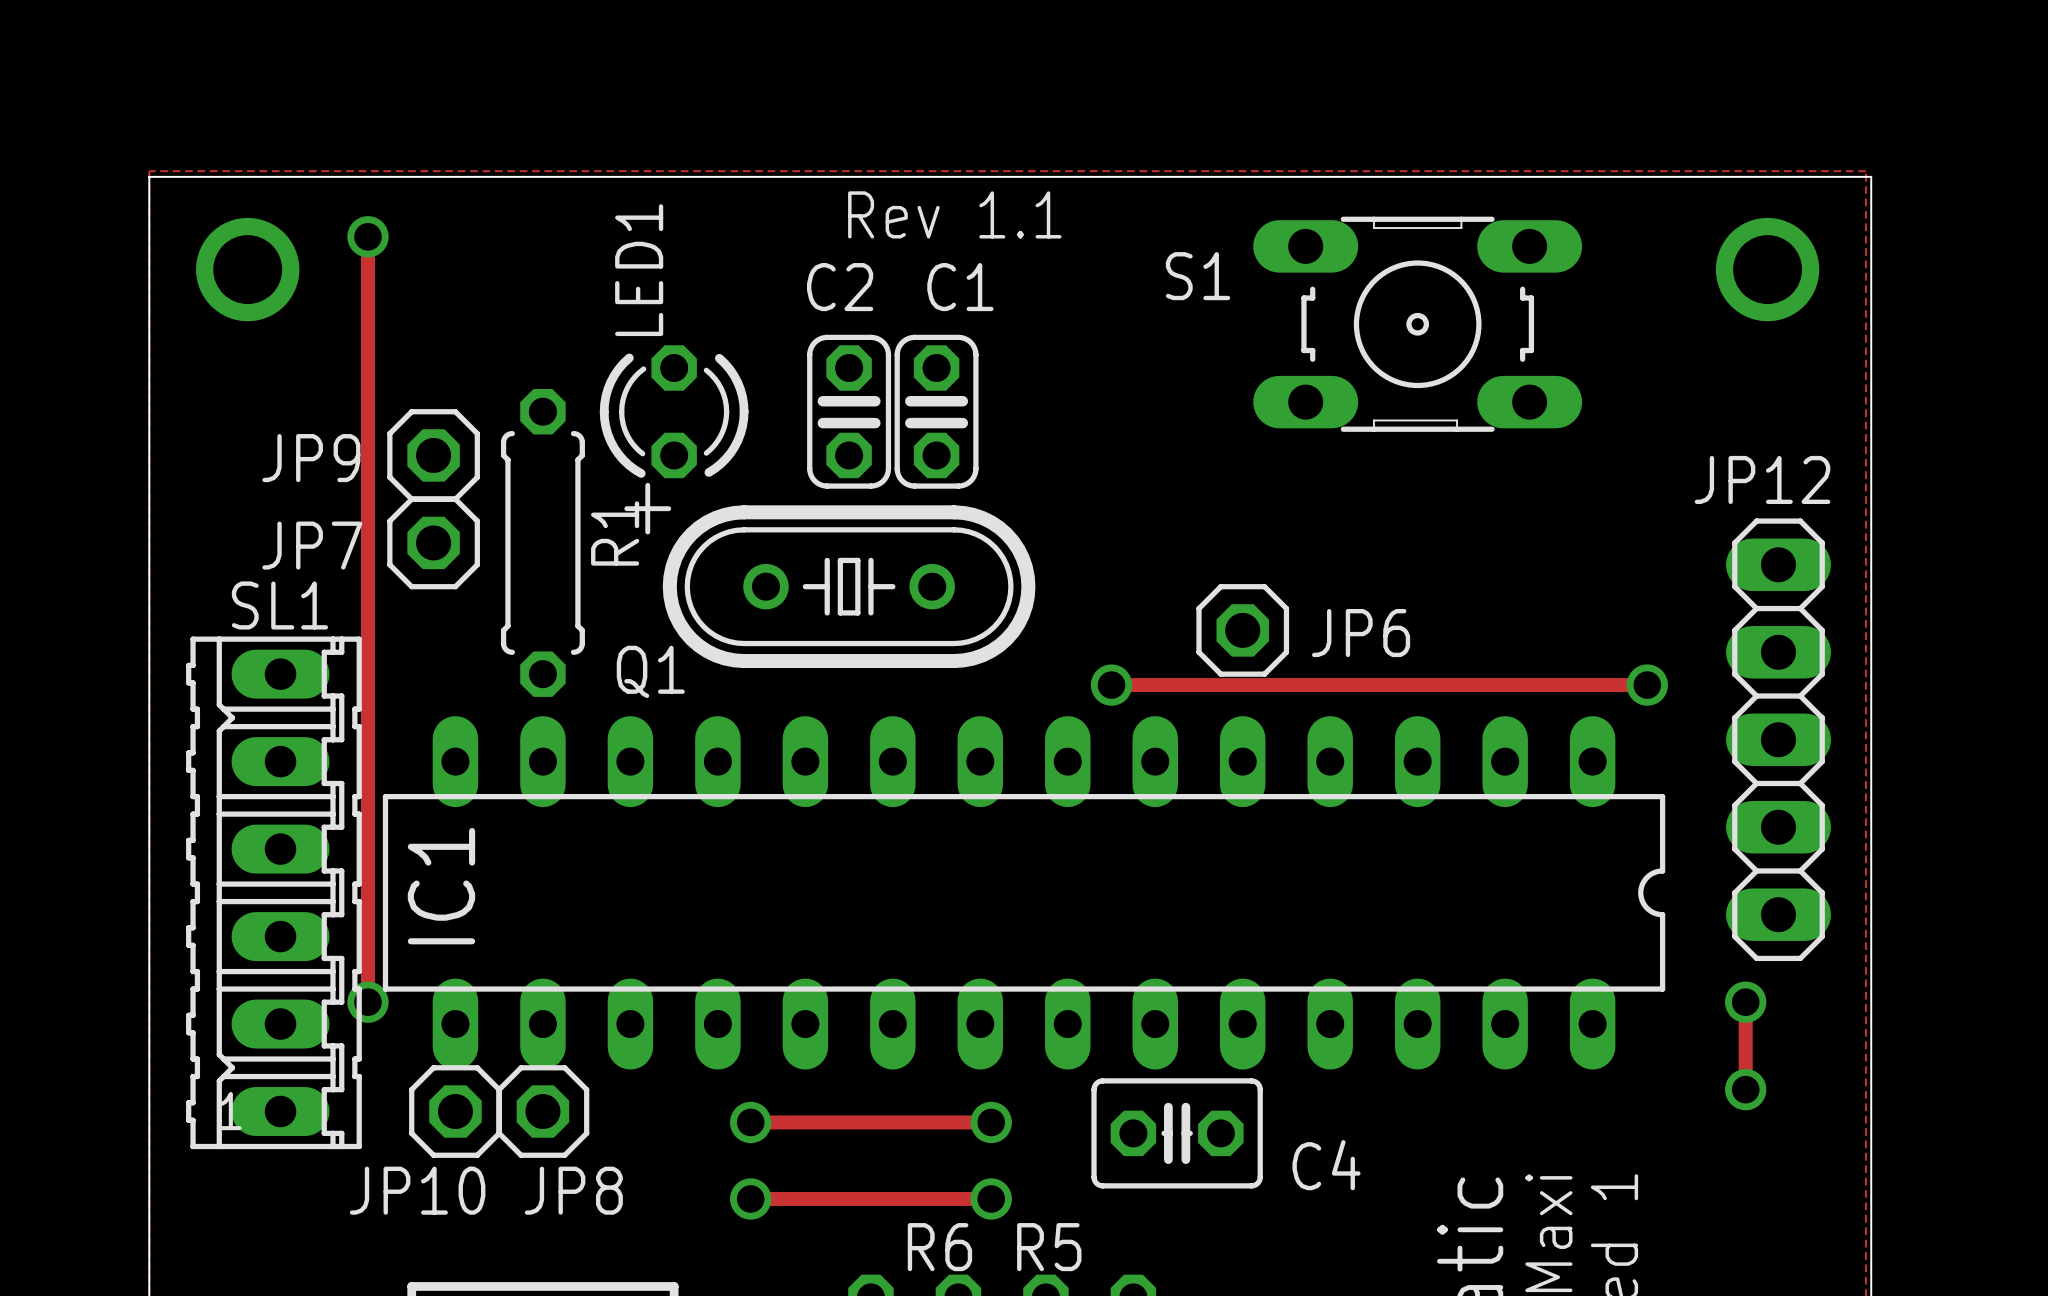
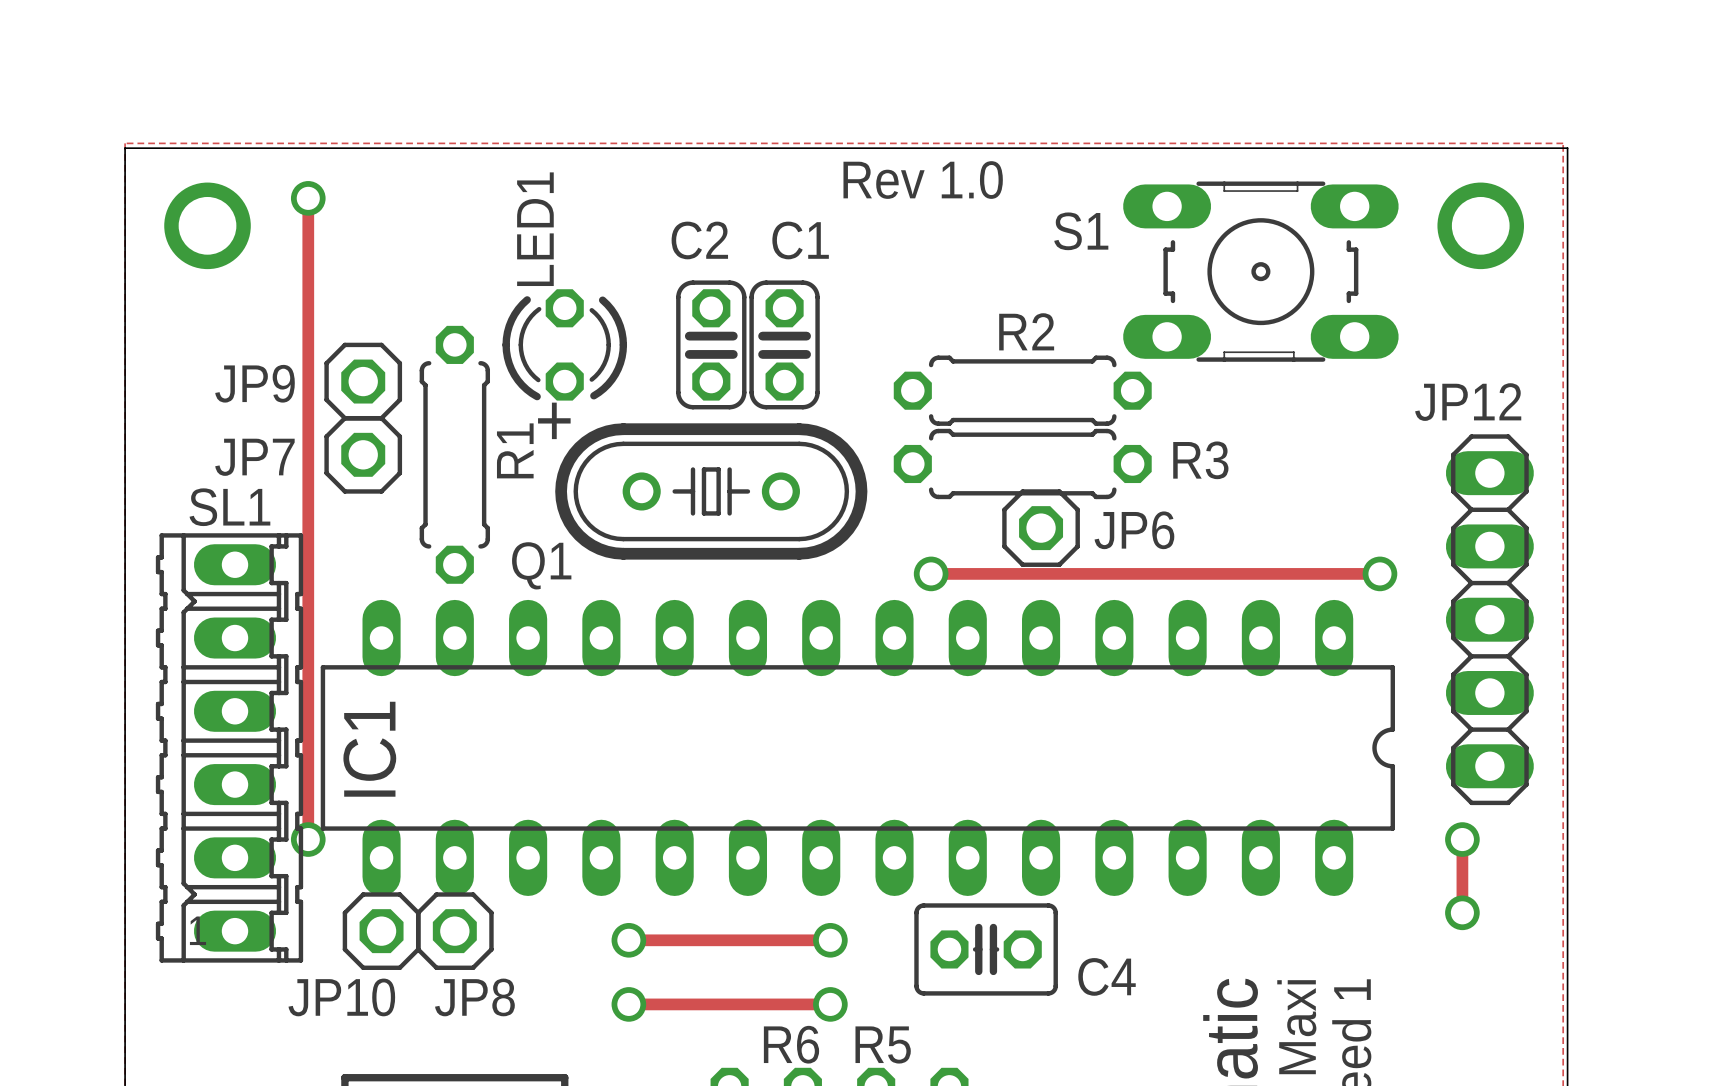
text: Rev 1.1 (954, 214) -> Rev 1.0 (923, 180)
S1 position: (1417, 324) -> (1260, 271)
R2: none -> (1022, 390)
R3: none -> (1022, 463)

